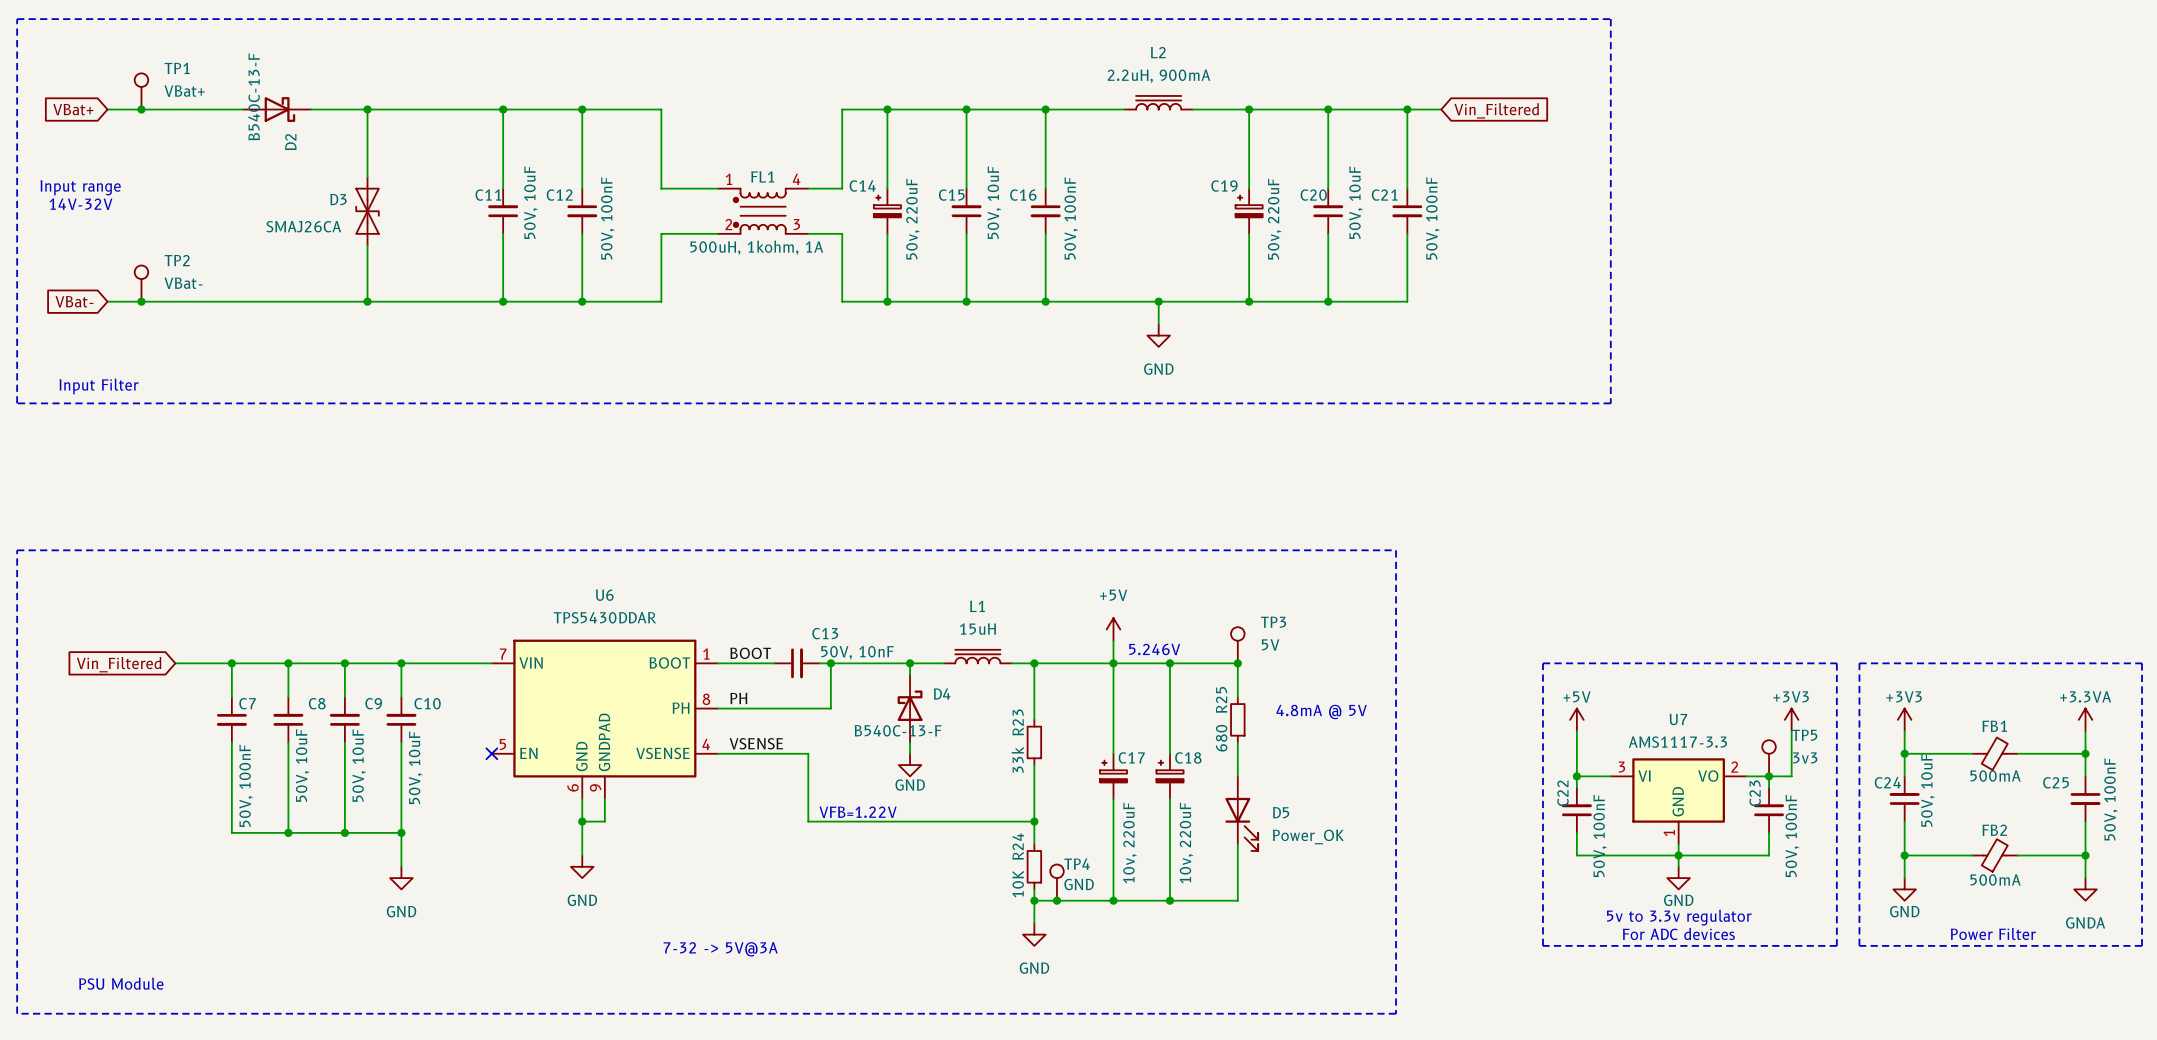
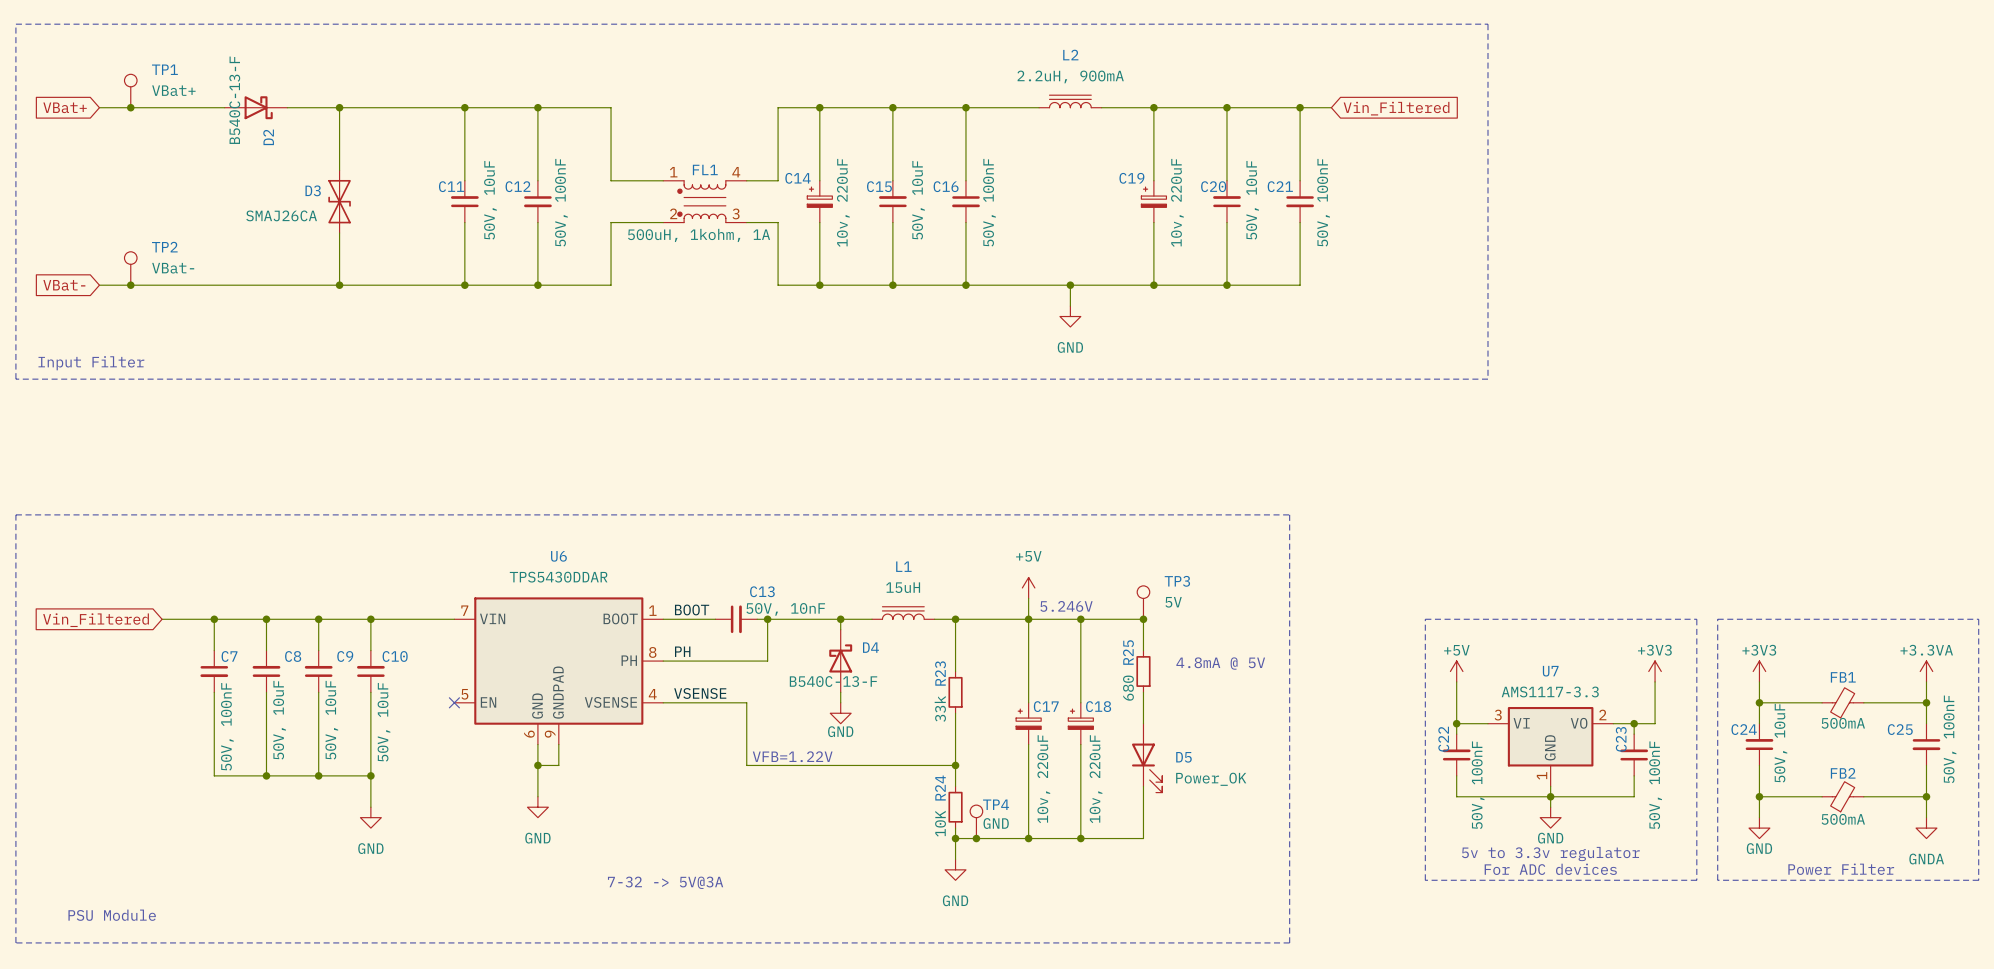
text: Input range (80, 187) -> none
text: 14V-32V (80, 204) -> none
C14 value: 50v, 220uF (913, 219) -> 10v, 220uF (843, 202)
C19 value: 50v, 220uF (1274, 219) -> 10v, 220uF (1177, 202)
TP5: 3v3 (1769, 758) -> none

